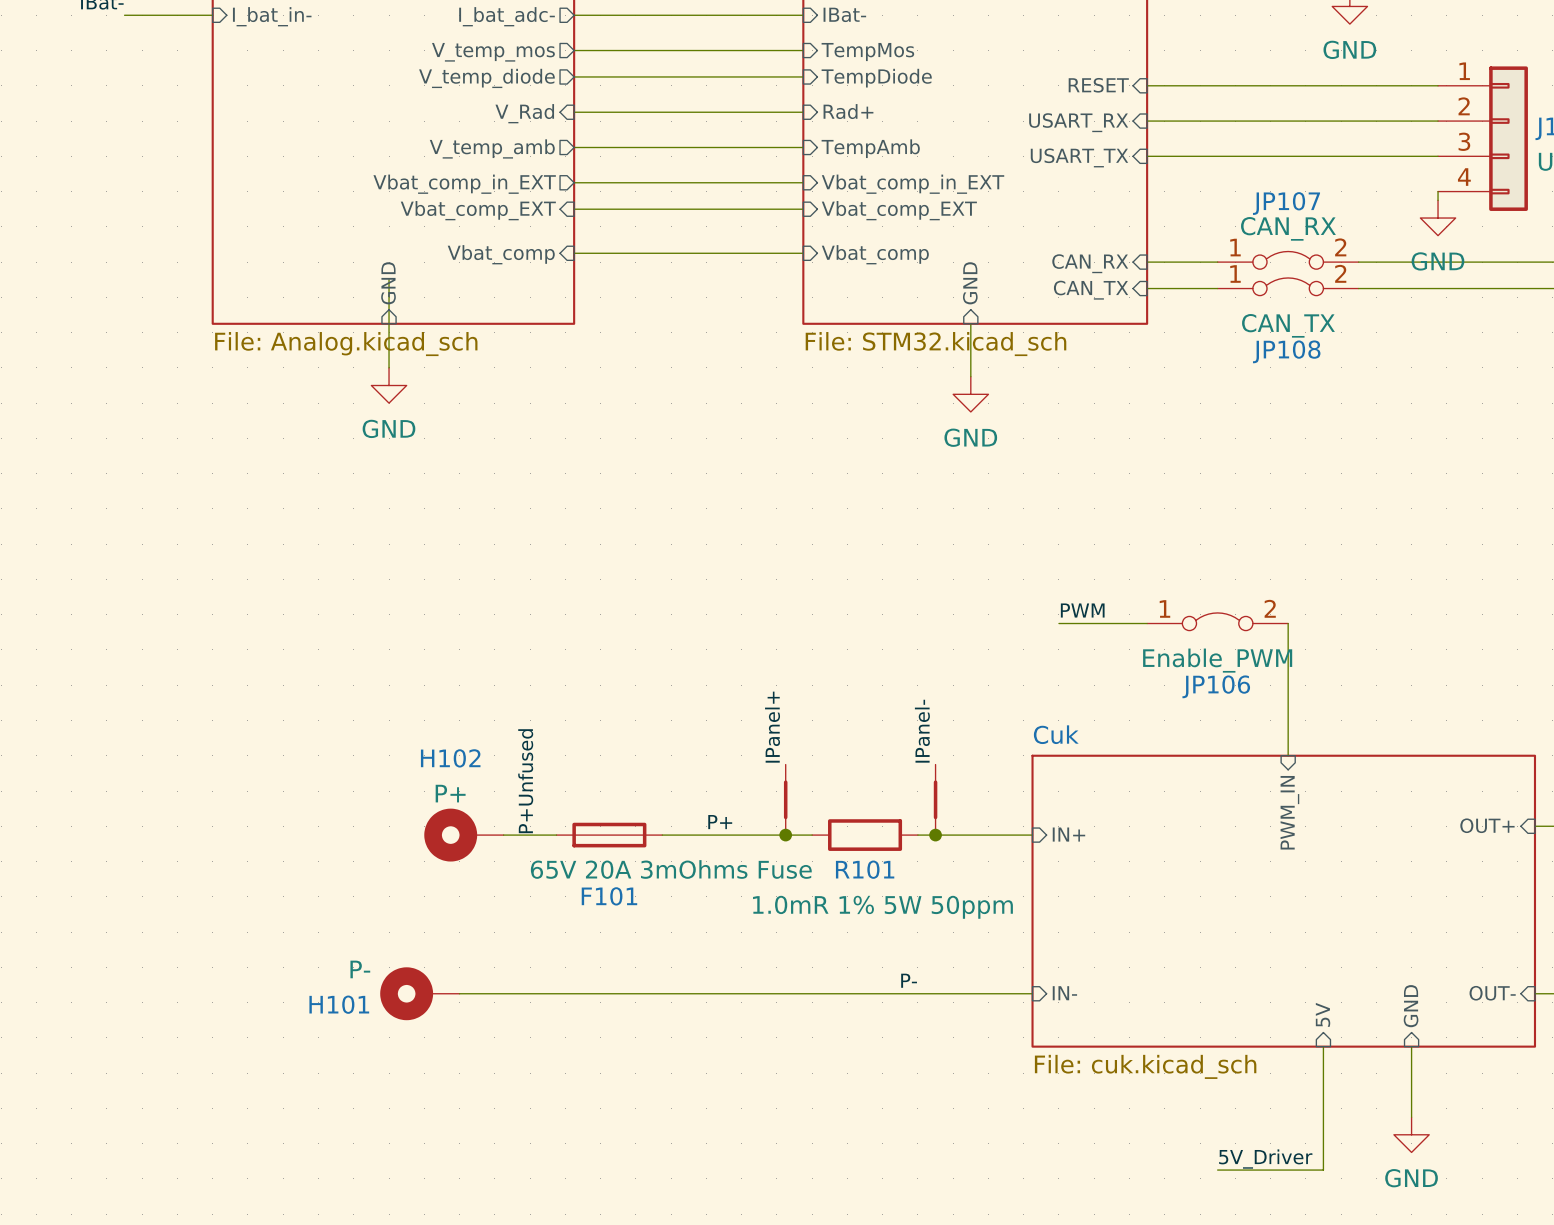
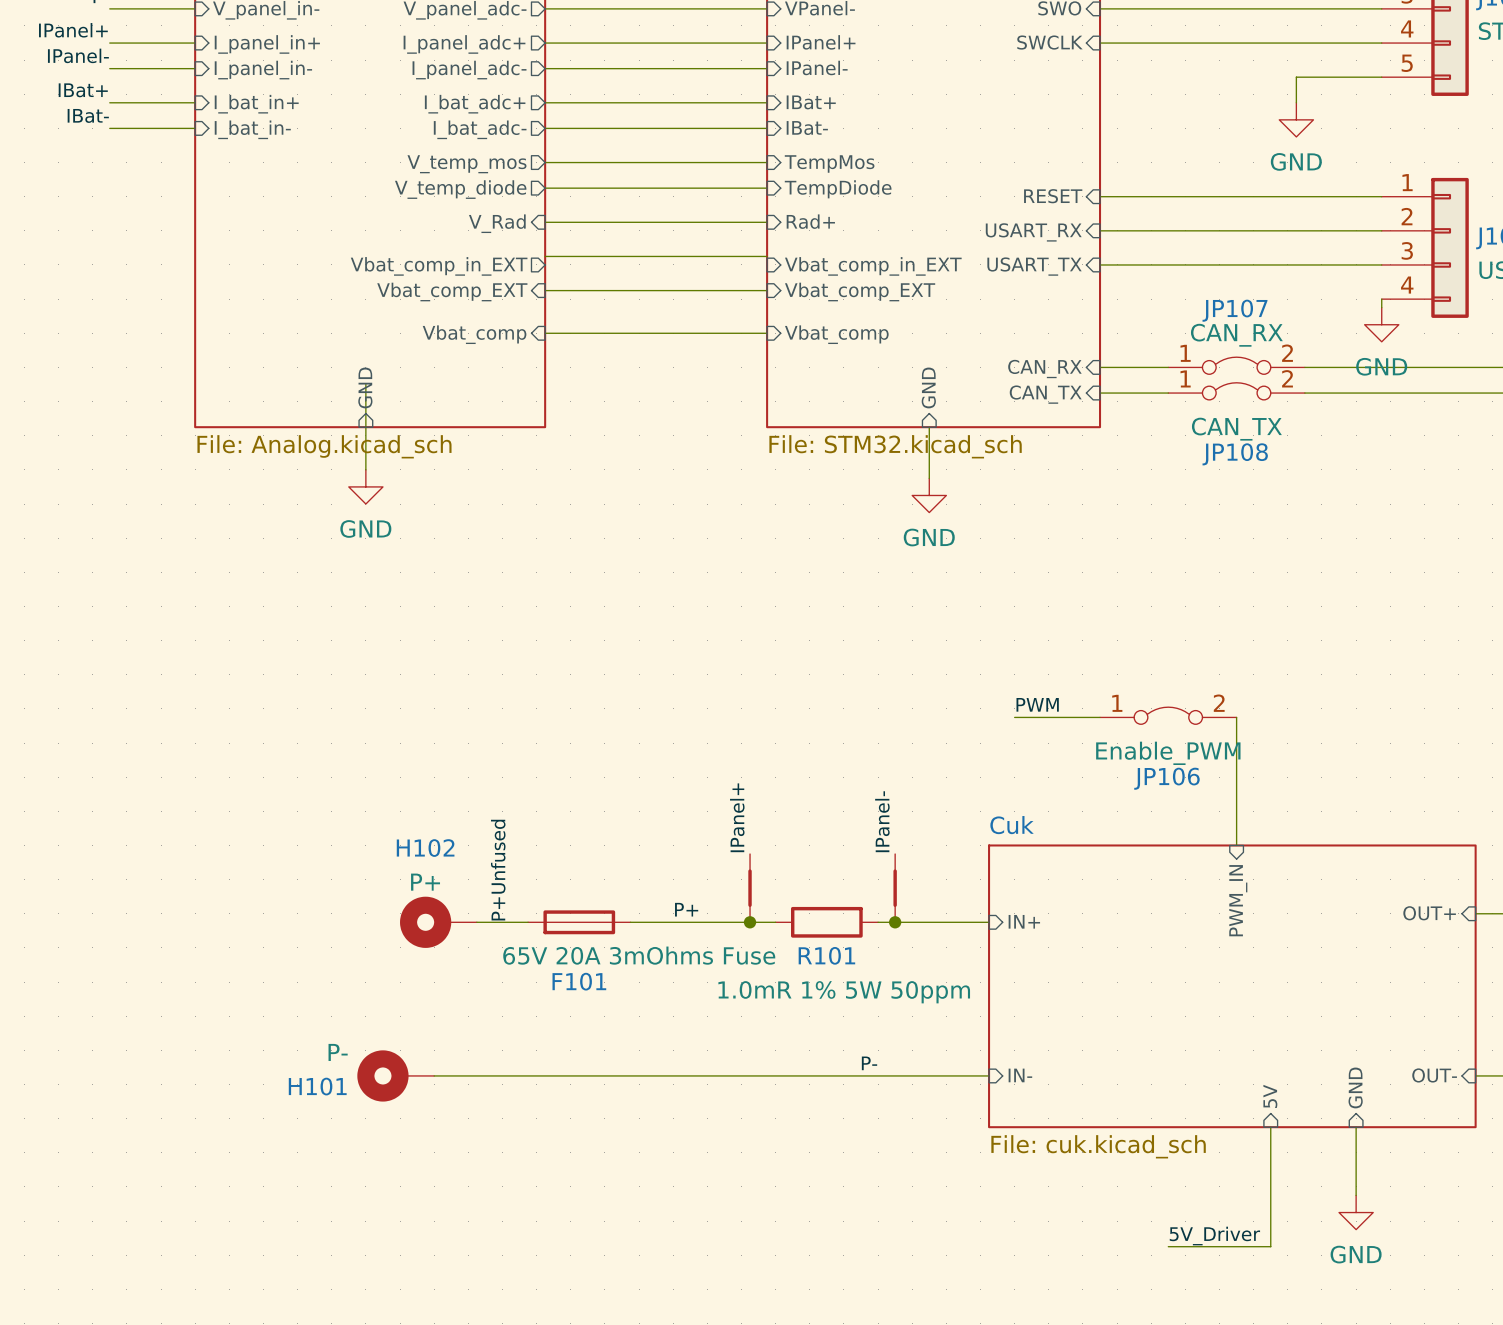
sheet pin: V_temp_amb (492, 148) -> Vbat_comp_in_EXT (439, 266)
sheet pin: TempAmb (870, 148) -> Vbat_comp_in_EXT (873, 266)
sheet pin shape: output (464, 184) -> input (452, 292)
sheet pin: Vbat_comp_in_EXT (464, 184) -> Vbat_comp_EXT (452, 292)
sheet pin: Vbat_comp_in_EXT (913, 184) -> Vbat_comp_EXT (860, 292)
wire: (574, 209) (803, 209) -> (545, 333) (767, 333)
sheet pin: Vbat_comp_EXT (478, 210) -> none
sheet pin: Vbat_comp_EXT (899, 210) -> none
wire: (574, 253) (803, 253) -> none
sheet pin position: Vbat_comp (501, 254) -> Vbat_comp (474, 334)
sheet pin position: Vbat_comp (875, 254) -> Vbat_comp (836, 334)

